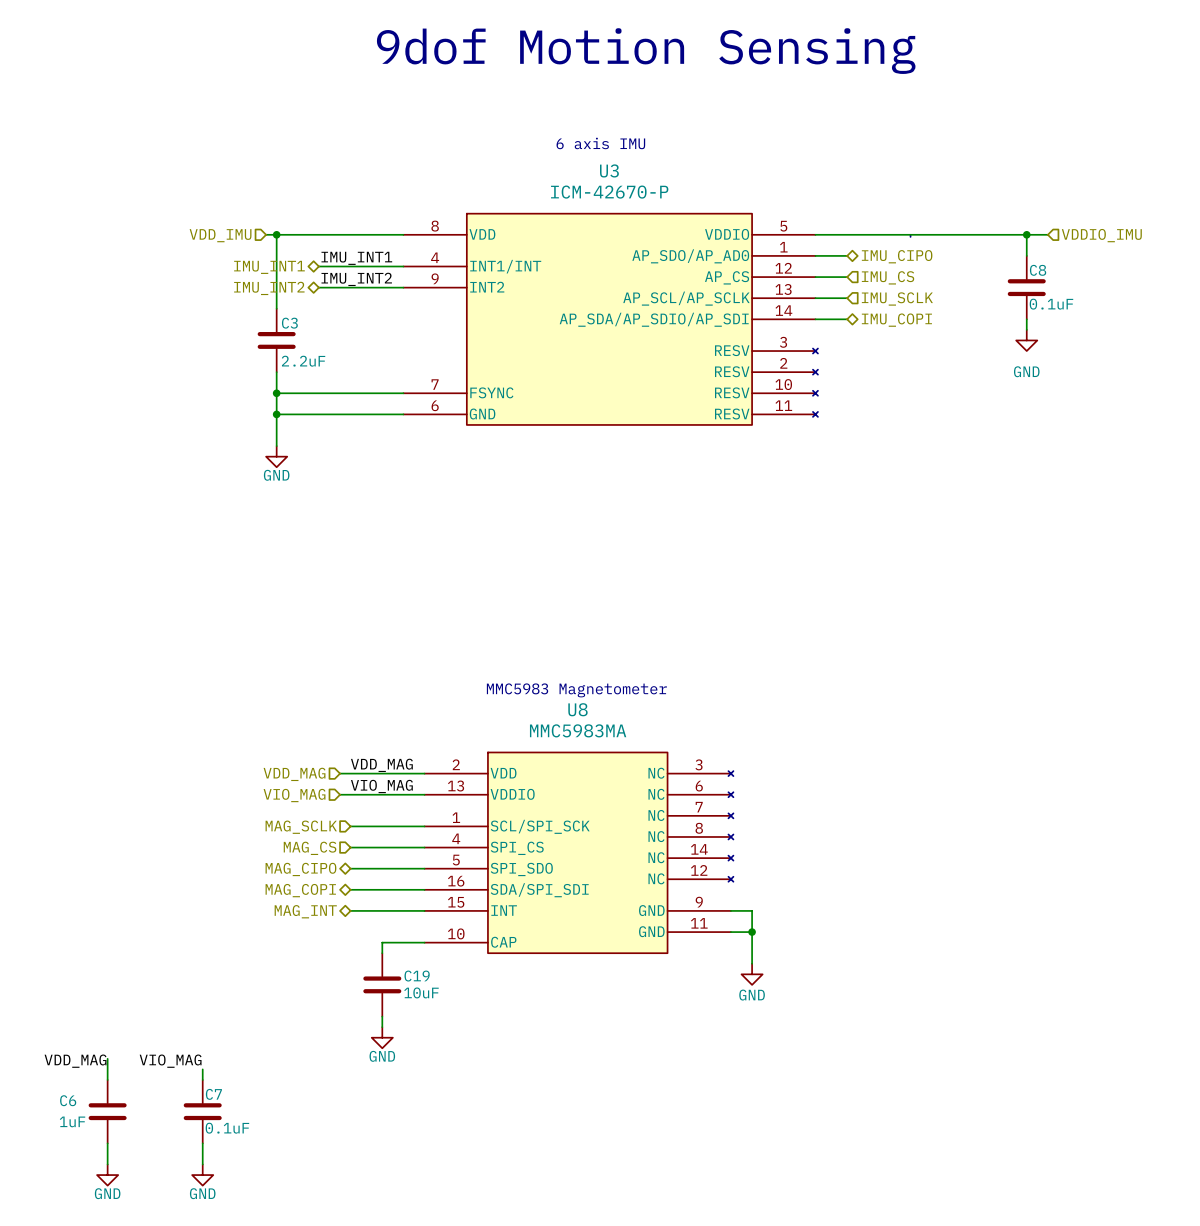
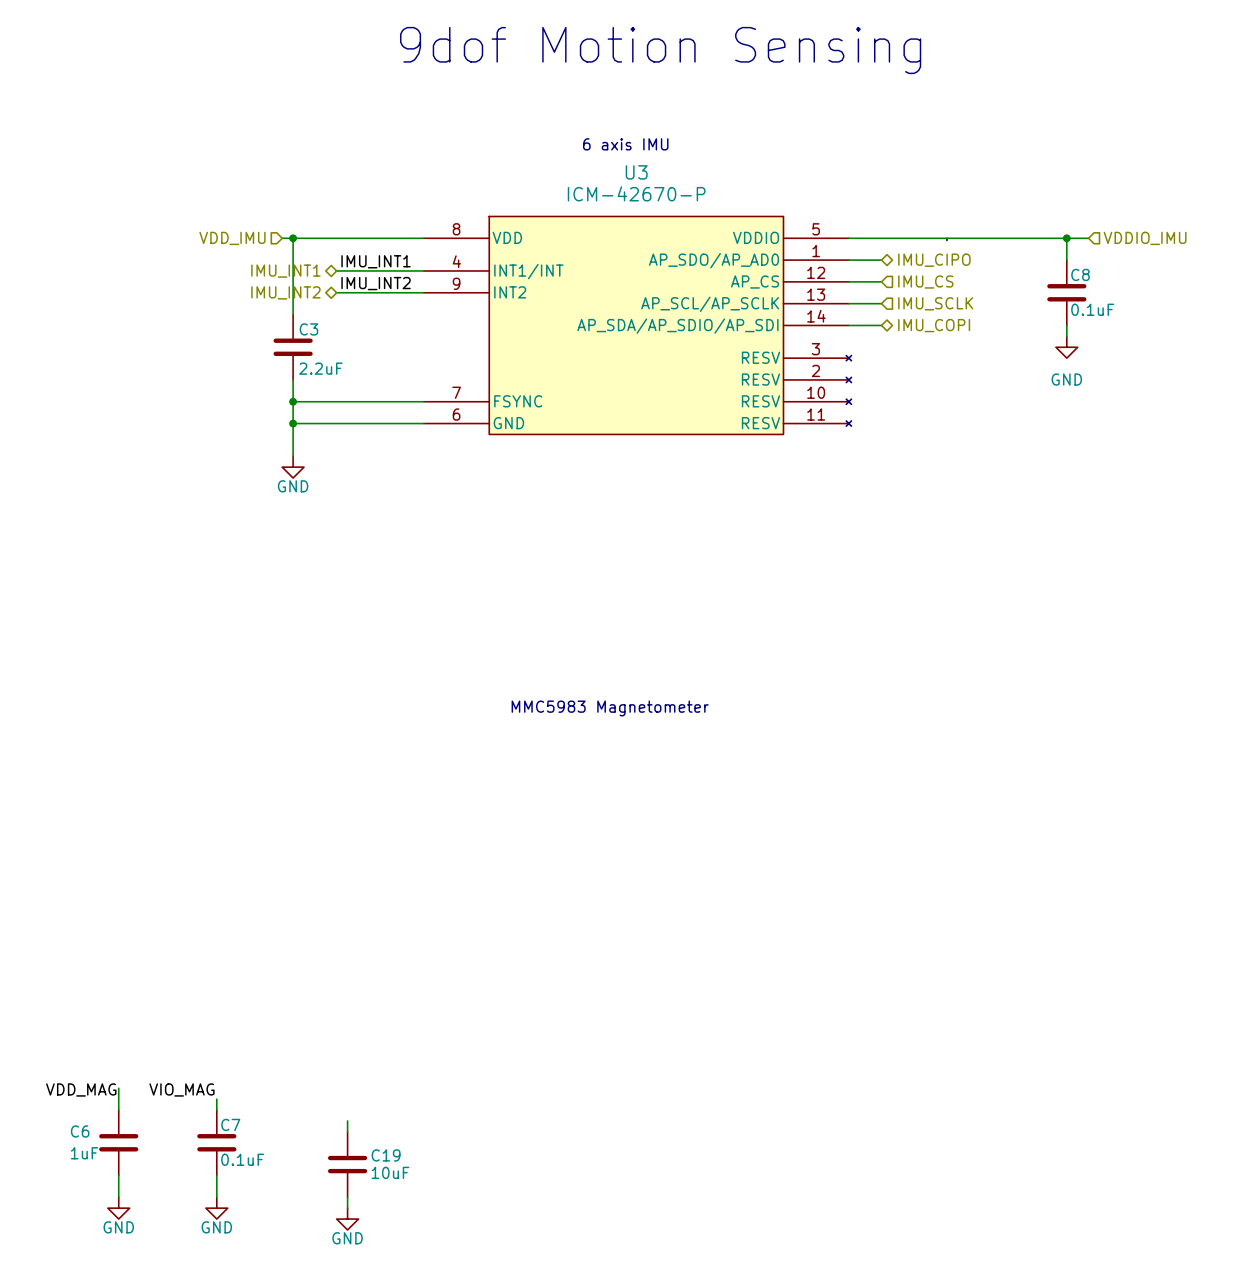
label: VDD_MAG (381, 765) -> none
wire: (340, 773) (424, 773) -> none
hierarchical label: VDD_MAG (294, 774) -> none
label: VIO_MAG (381, 786) -> none
wire: (340, 794) (424, 794) -> none
hierarchical label: VIO_MAG (294, 795) -> none
wire: (350, 826) (424, 826) -> none
hierarchical label: MAG_SCLK (301, 827) -> none
wire: (350, 847) (424, 847) -> none
hierarchical label: MAG_CS (310, 848) -> none
U8: MMC5983MA (579, 852) -> none
wire: (350, 868) (424, 868) -> none
hierarchical label: MAG_CIPO (300, 869) -> none
wire: (350, 889) (424, 889) -> none
hierarchical label: MAG_COPI (300, 890) -> none
wire: (350, 910) (424, 910) -> none
wire: (730, 910) (752, 910) (752, 963) -> none
hierarchical label: MAG_INT (305, 911) -> none
wire: (730, 932) (752, 932) -> none
junction: (752, 932) -> none
wire: (424, 942) (382, 942) (382, 953) -> none
power symbol: GND (752, 974) -> none
C19 position: (382, 984) -> (347, 1164)
wire: (382, 1016) (382, 1027) -> (347, 1120) (347, 1131)
power symbol position: GND (382, 1037) -> GND (347, 1219)
wire: none -> (347, 1197) (347, 1208)

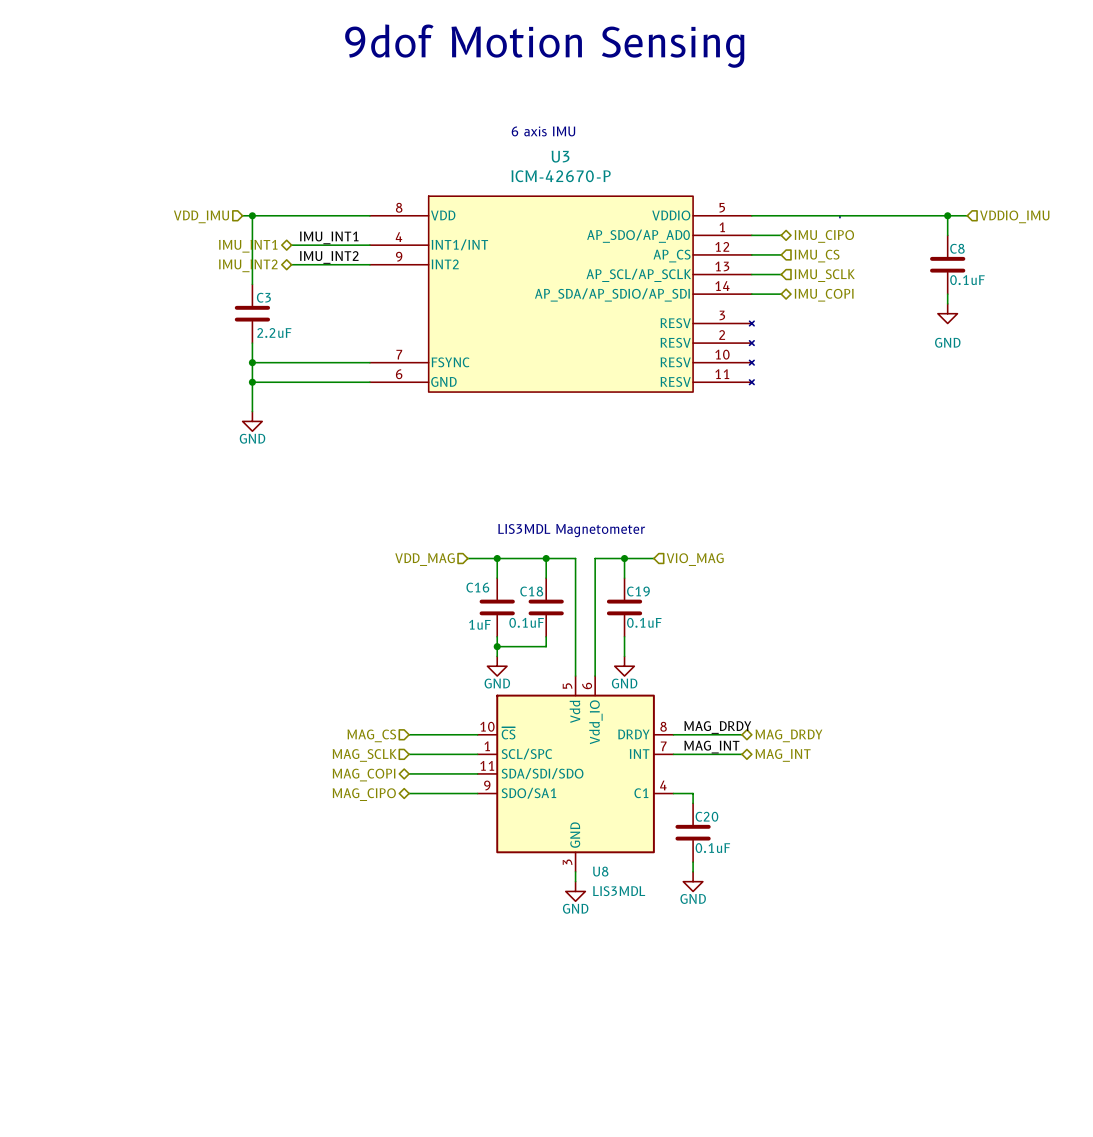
text: none -> LIS3MDL Magnetometer (571, 530)
hierarchical label: none -> VDD_MAG (425, 559)
wire: none -> (467, 558) (575, 558) (575, 676)
wire: none -> (497, 558) (497, 578)
junction: none -> (497, 558)
wire: none -> (546, 558) (546, 578)
junction: none -> (546, 558)
wire: none -> (624, 558) (624, 578)
junction: none -> (624, 558)
wire: none -> (653, 558) (595, 558) (595, 676)
hierarchical label: none -> VIO_MAG (695, 559)
C16: none -> 1uF (497, 607)
C18: none -> 0.1uF (546, 607)
wire: none -> (497, 636) (497, 656)
wire: none -> (546, 636) (546, 646) (497, 646)
wire: none -> (624, 636) (624, 656)
text: MMC5983 Magnetometer (610, 708) -> none
junction: none -> (497, 646)
power symbol: none -> GND (497, 666)
power symbol: none -> GND (624, 666)
label: none -> MAG_DRDY (717, 727)
hierarchical label: none -> MAG_CS (371, 735)
wire: none -> (409, 734) (477, 734)
wire: none -> (673, 734) (742, 734)
hierarchical label: none -> MAG_DRDY (788, 735)
label: none -> MAG_INT (711, 747)
hierarchical label: none -> MAG_SCLK (364, 755)
wire: none -> (409, 754) (477, 754)
wire: none -> (673, 754) (742, 754)
hierarchical label: none -> MAG_INT (783, 755)
hierarchical label: none -> MAG_COPI (364, 775)
wire: none -> (409, 773) (477, 773)
U8: none -> LIS3MDL (575, 773)
hierarchical label: none -> MAG_CIPO (364, 794)
wire: none -> (409, 793) (477, 793)
wire: none -> (673, 793) (693, 793) (693, 803)
C20: none -> 0.1uF (693, 832)
wire: none -> (693, 862) (693, 871)
wire: none -> (575, 871) (575, 881)
power symbol: none -> GND (693, 881)
power symbol: none -> GND (575, 891)
wire: (118, 1088) (118, 1110) -> none
label: VDD_MAG (81, 1089) -> none
label: VIO_MAG (181, 1089) -> none
wire: (216, 1099) (216, 1110) -> none
wire: (347, 1120) (347, 1131) -> none
C6: 1uF (118, 1142) -> none
C7: 0.1uF (216, 1142) -> none
C19 name position: C19 (386, 1155) -> C19 (638, 591)
C19 position: (347, 1164) -> (624, 607)
C19 value: 10uF (390, 1172) -> 0.1uF (644, 622)
wire: (118, 1175) (118, 1197) -> none
wire: (216, 1175) (216, 1197) -> none
wire: (347, 1197) (347, 1208) -> none
power symbol: GND (118, 1208) -> none
power symbol: GND (216, 1208) -> none
power symbol: GND (347, 1219) -> none

